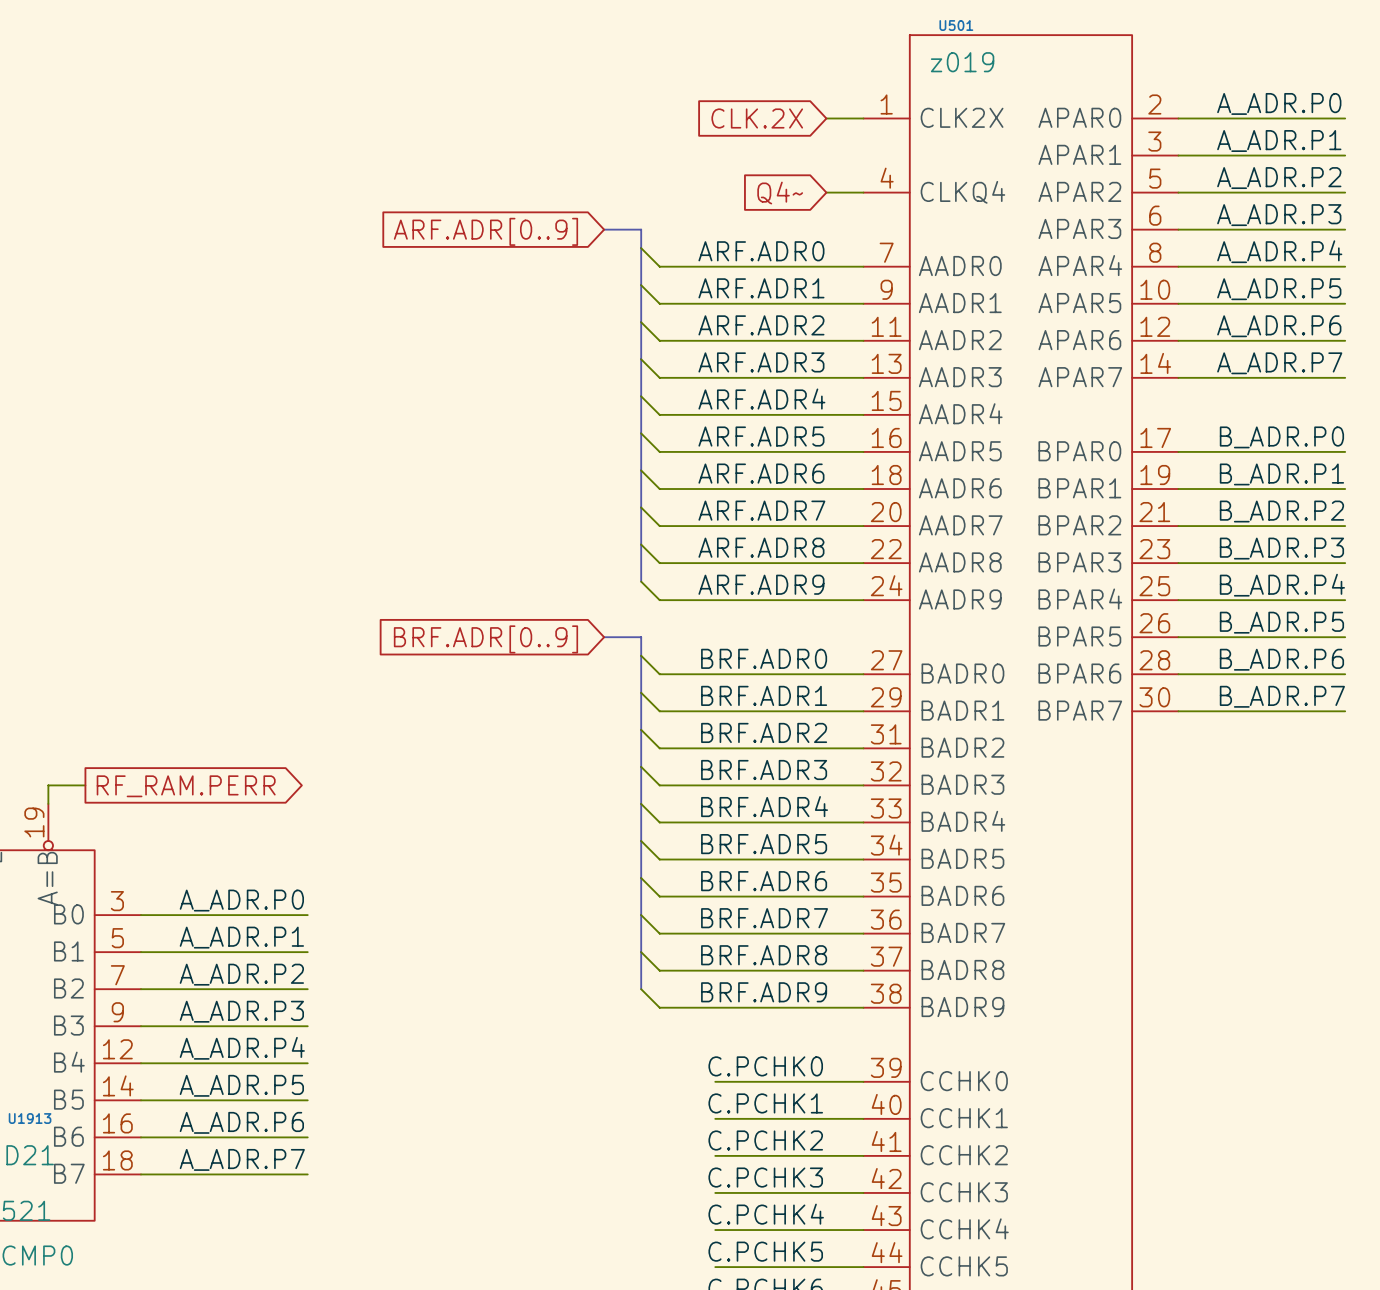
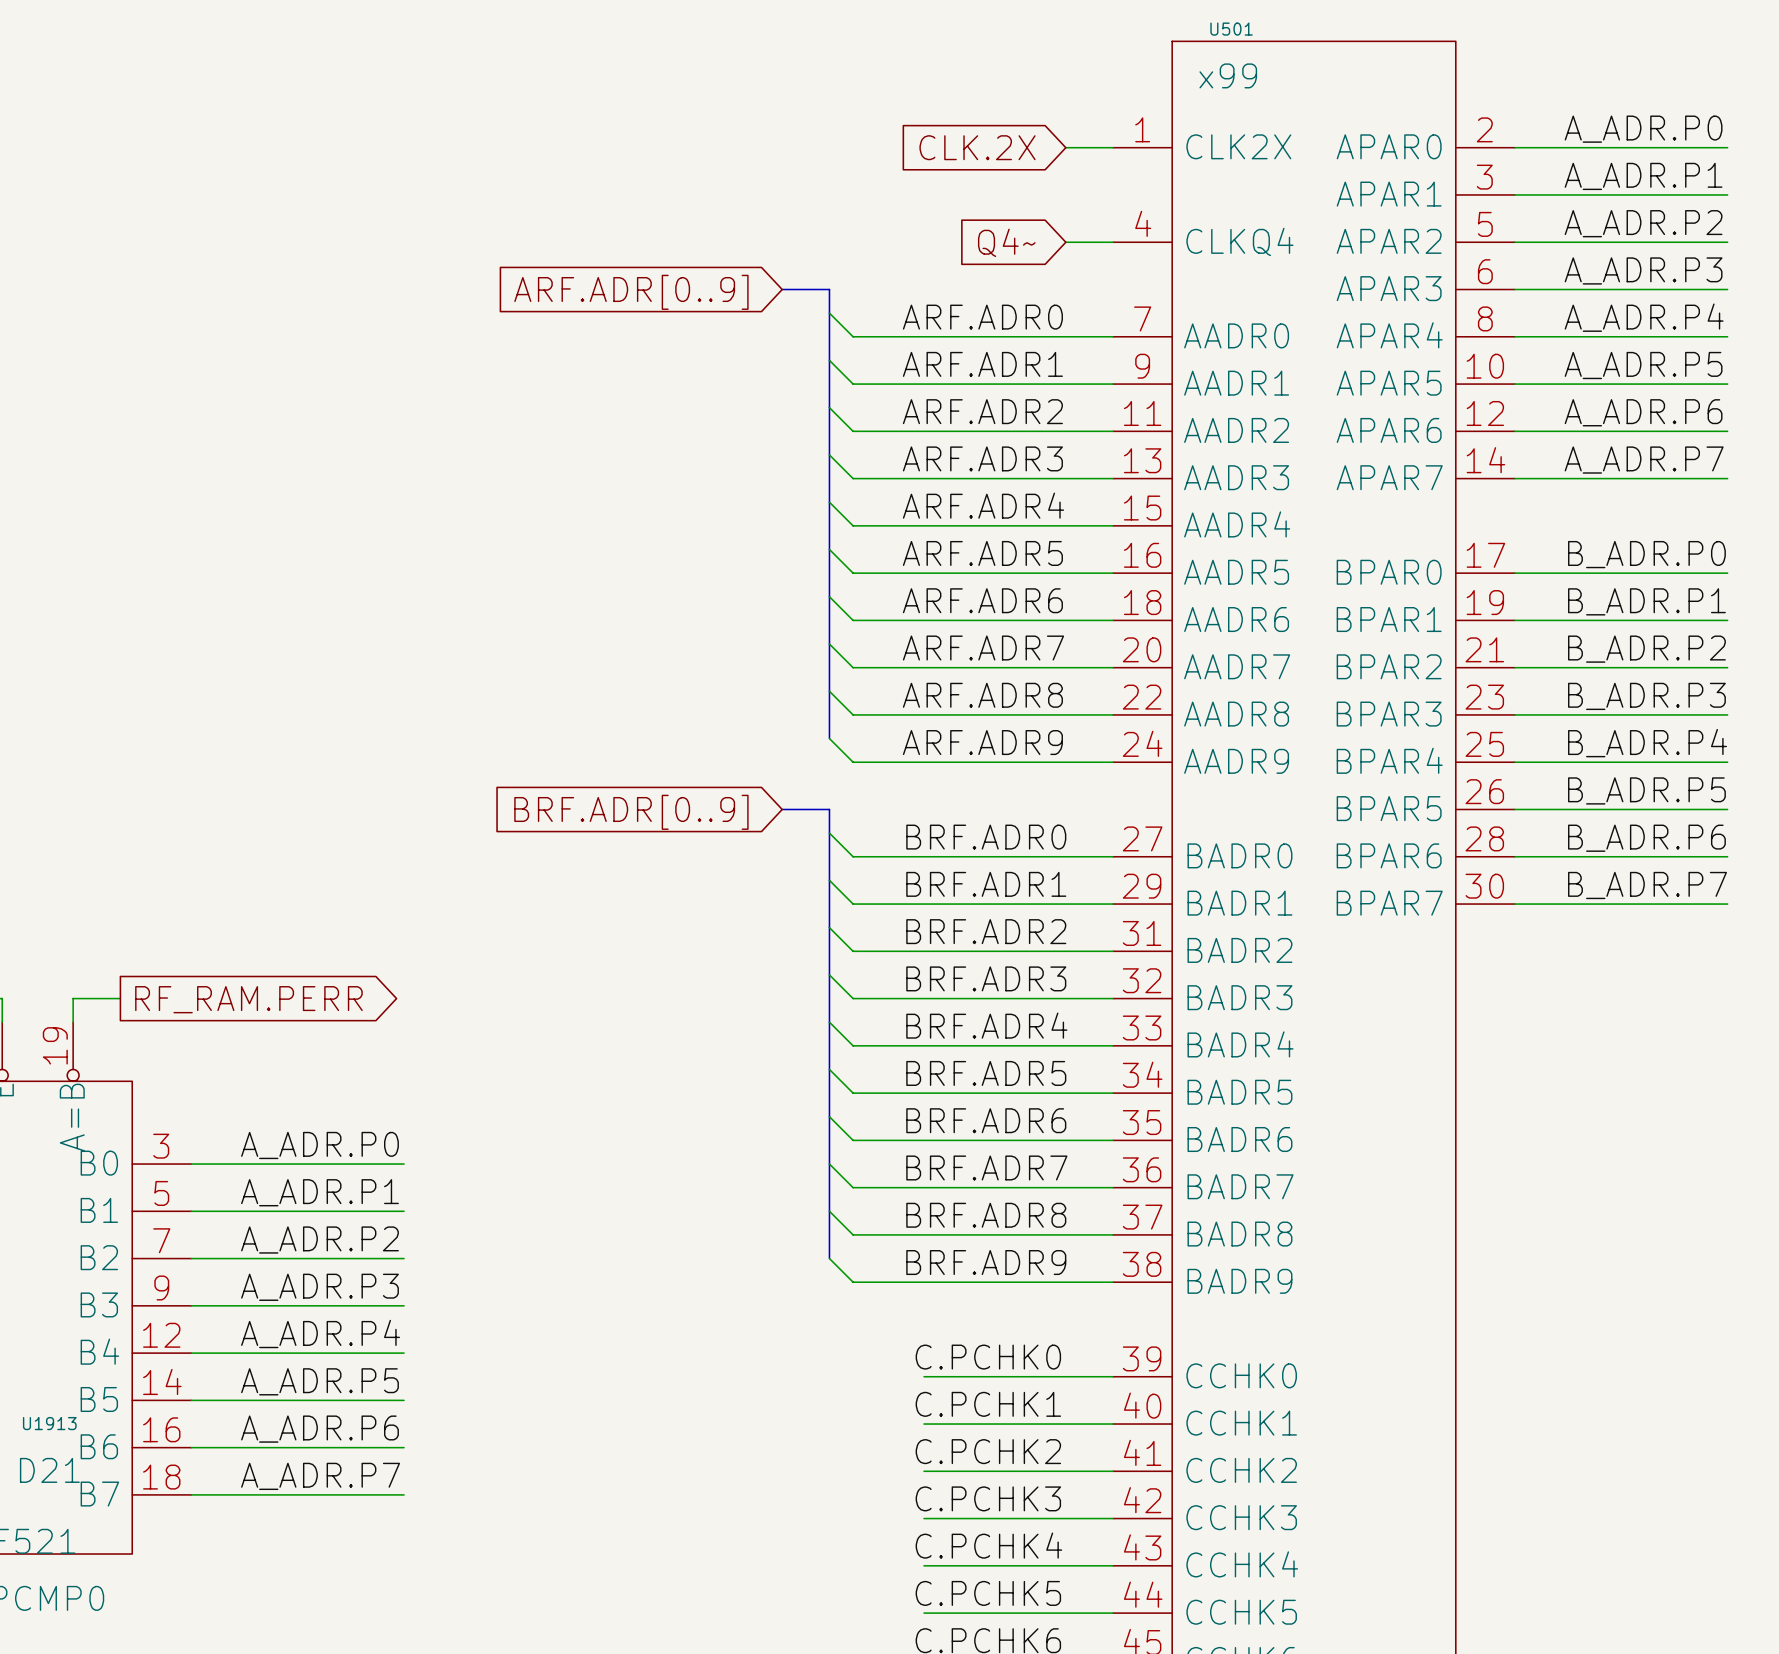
U501 text: z019 (962, 62) -> x99 (1228, 75)

